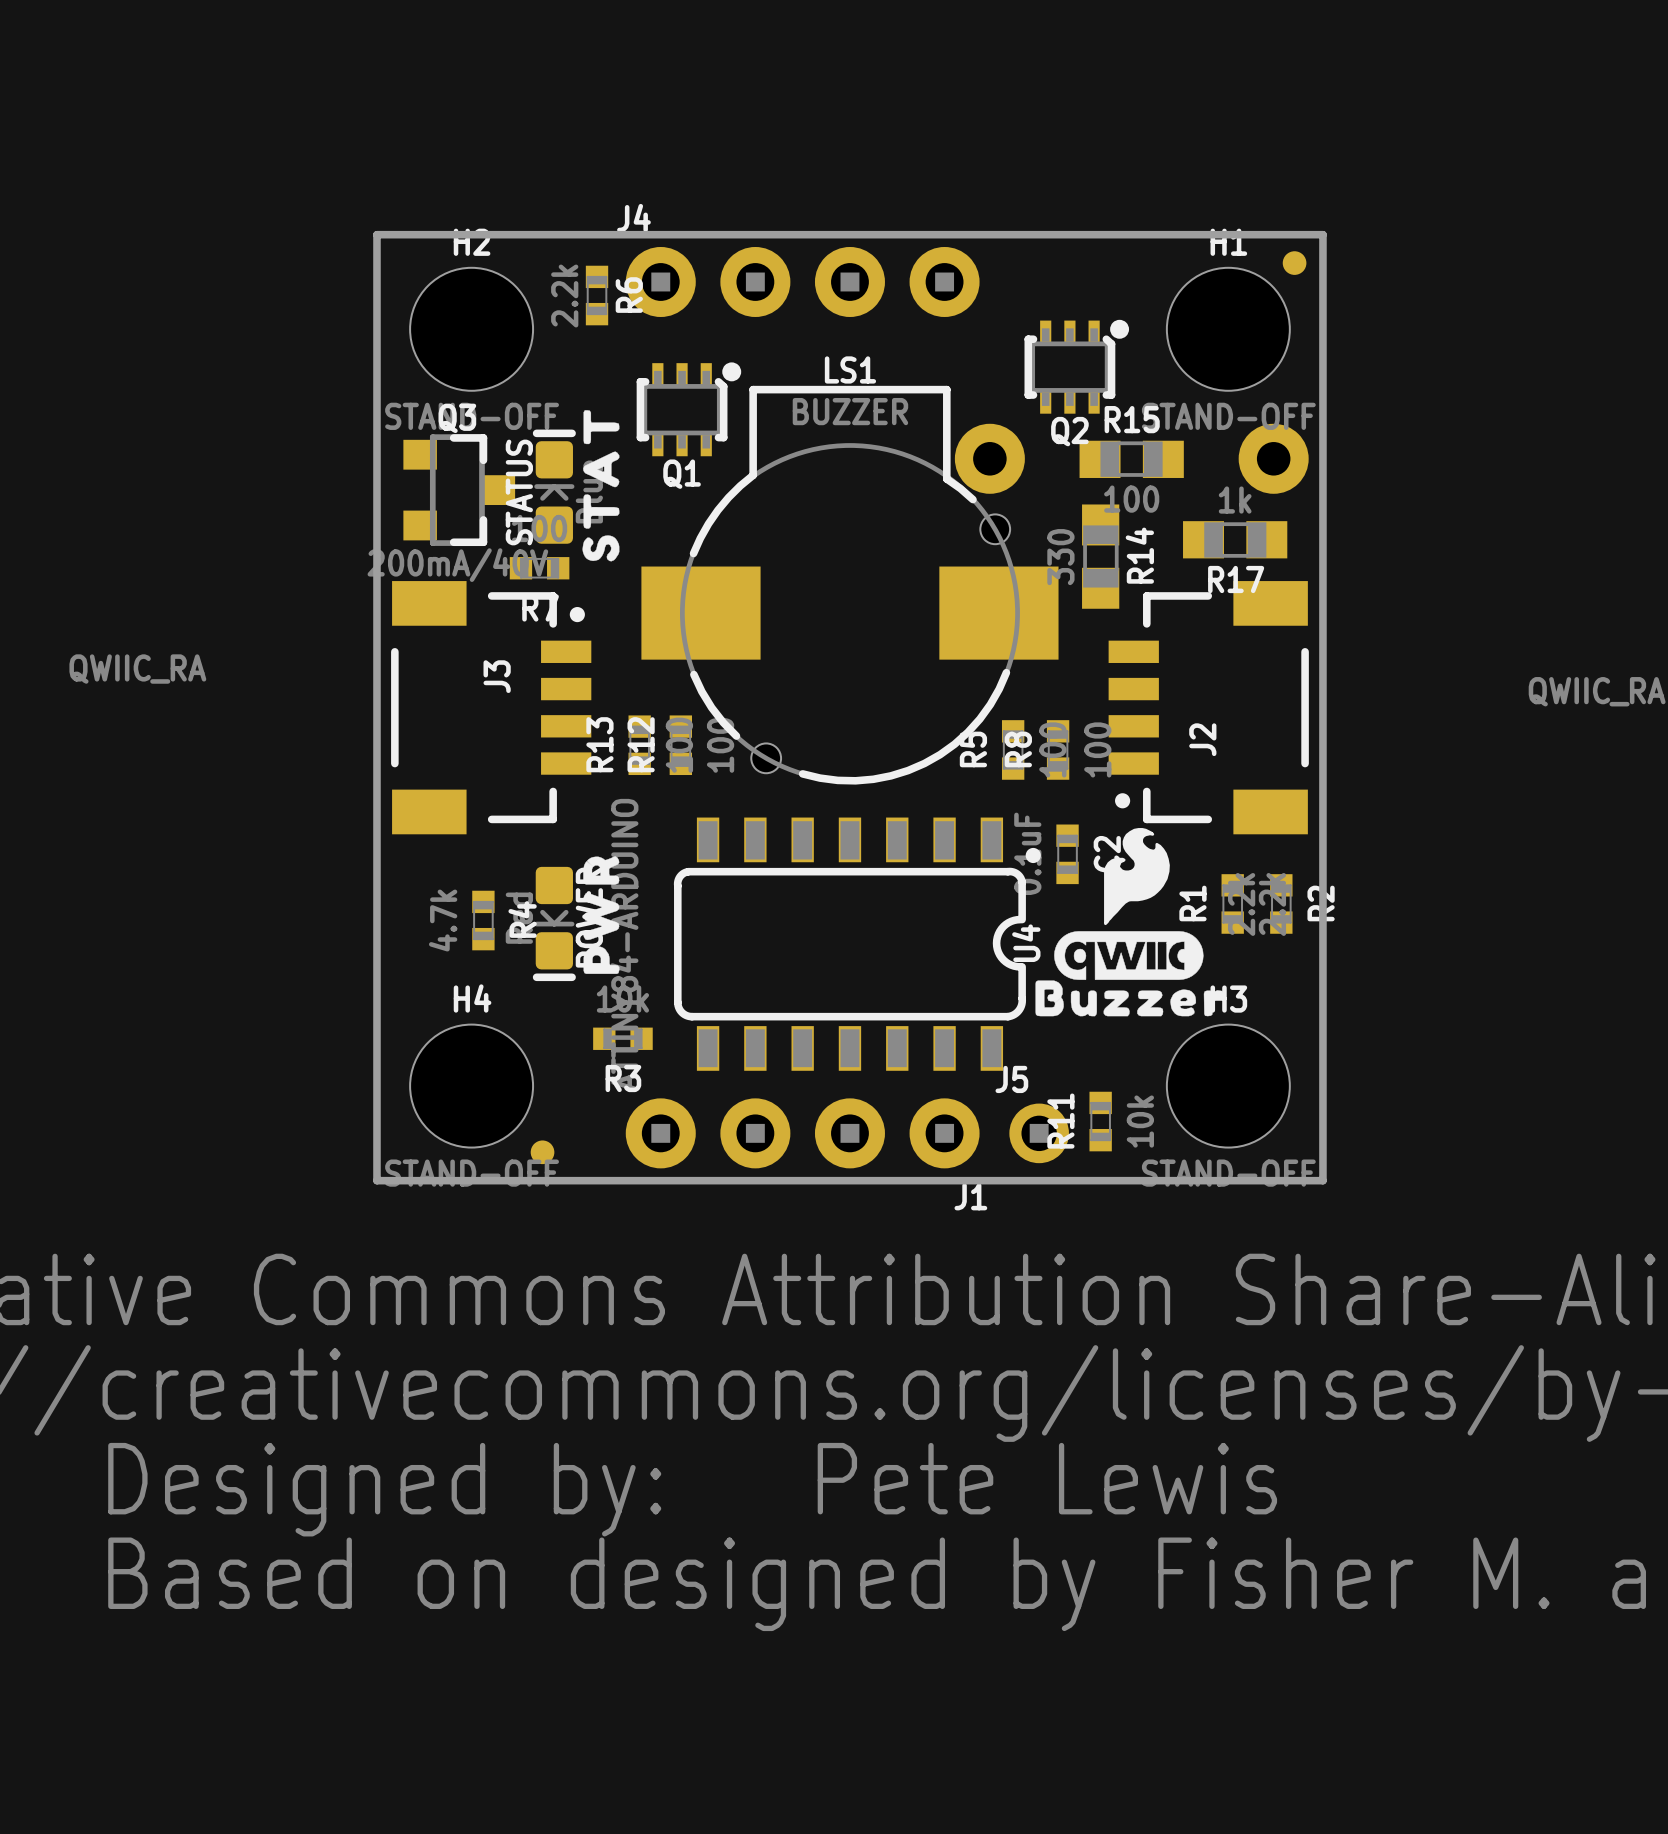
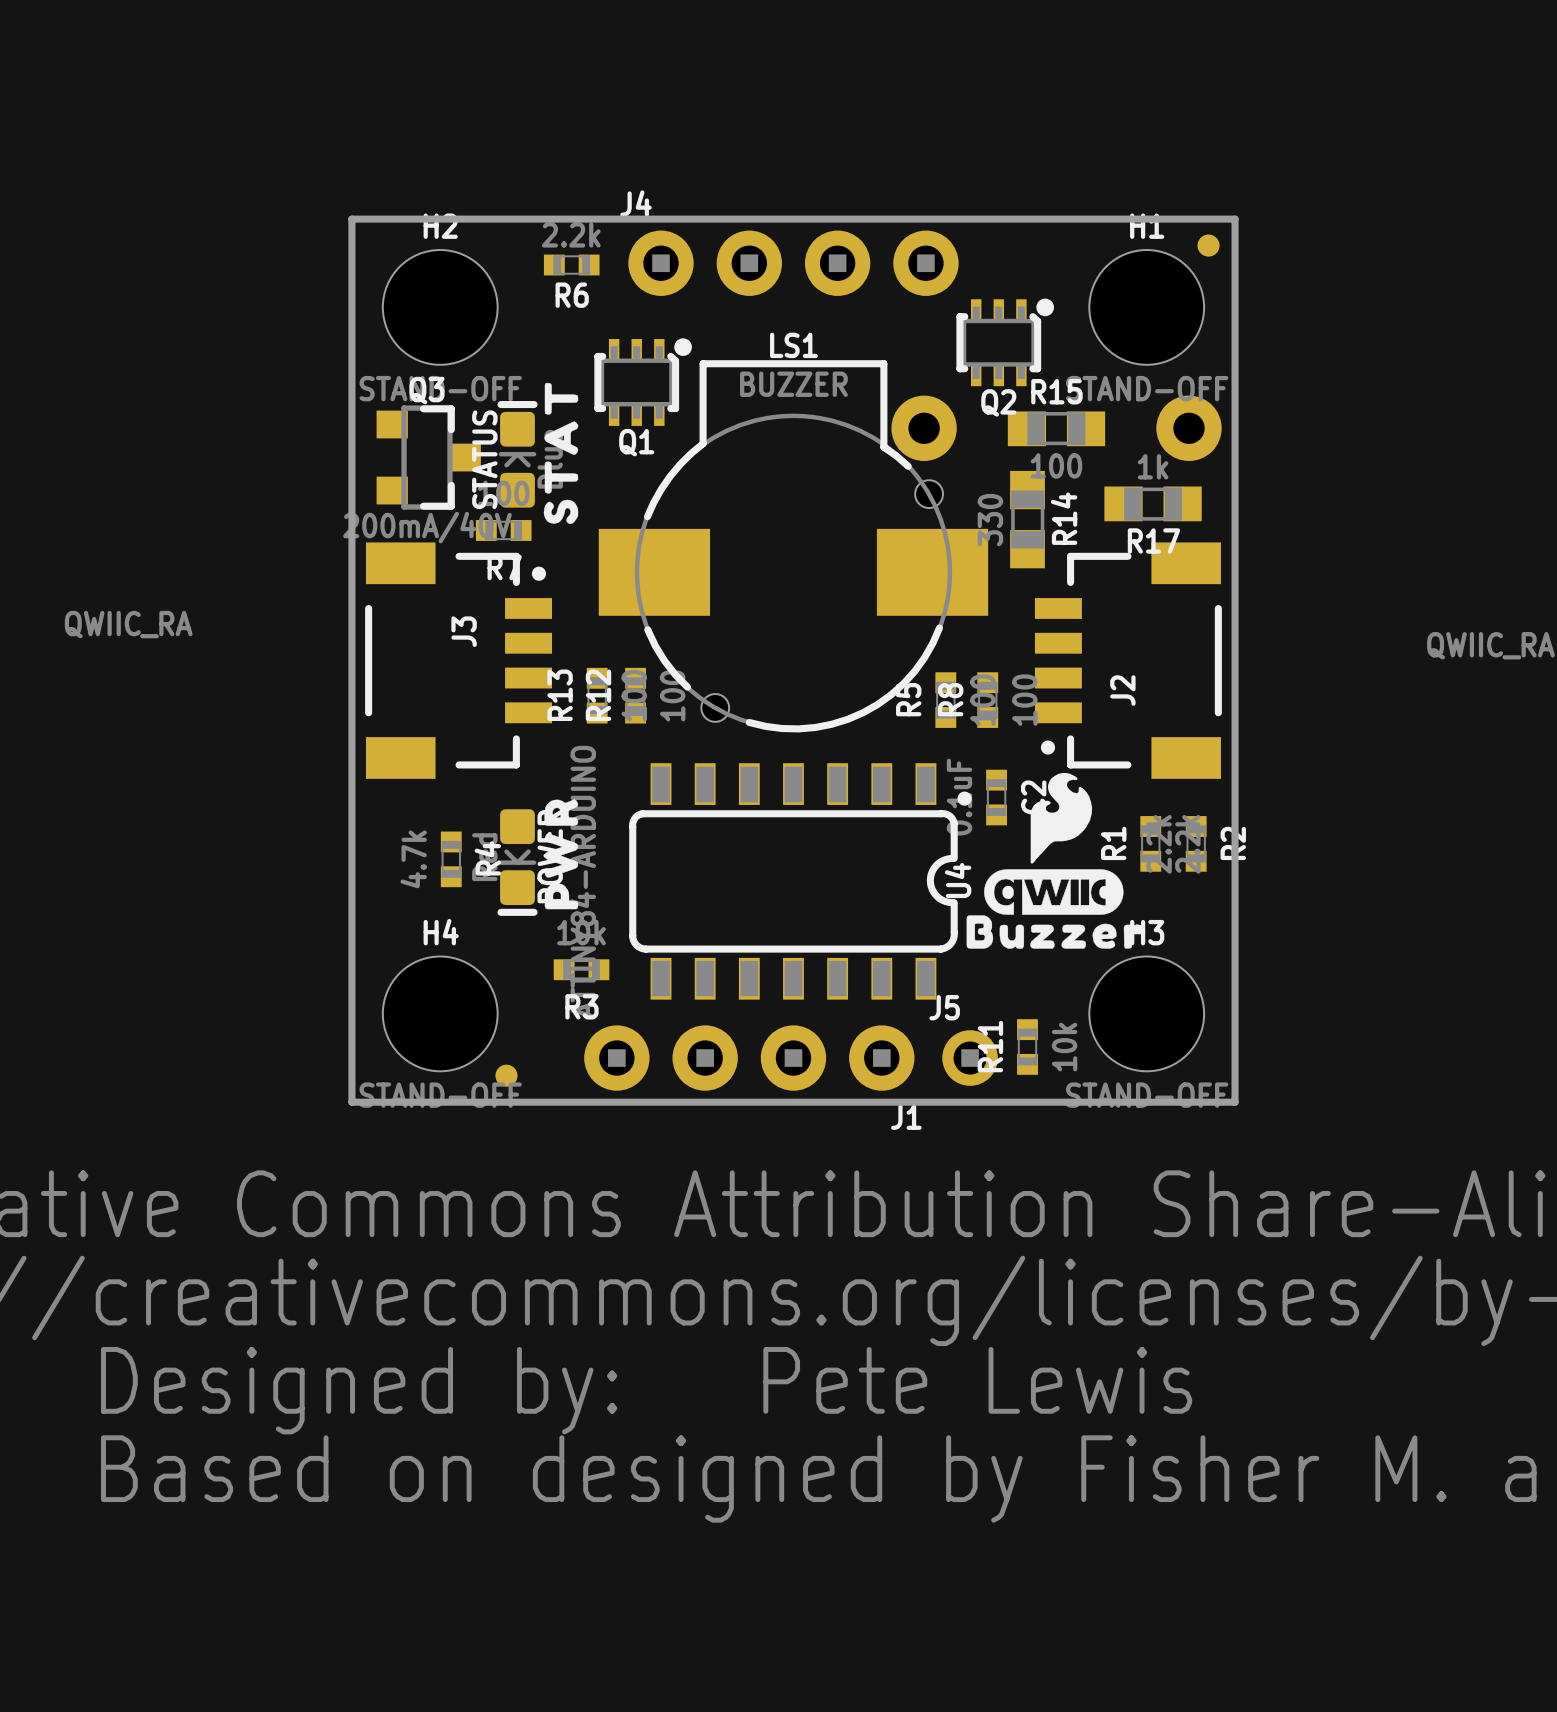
J4 position: (802, 281) -> (793, 263)
R6 rotation: 0° (597, 295) -> 90° clockwise (571, 265)

